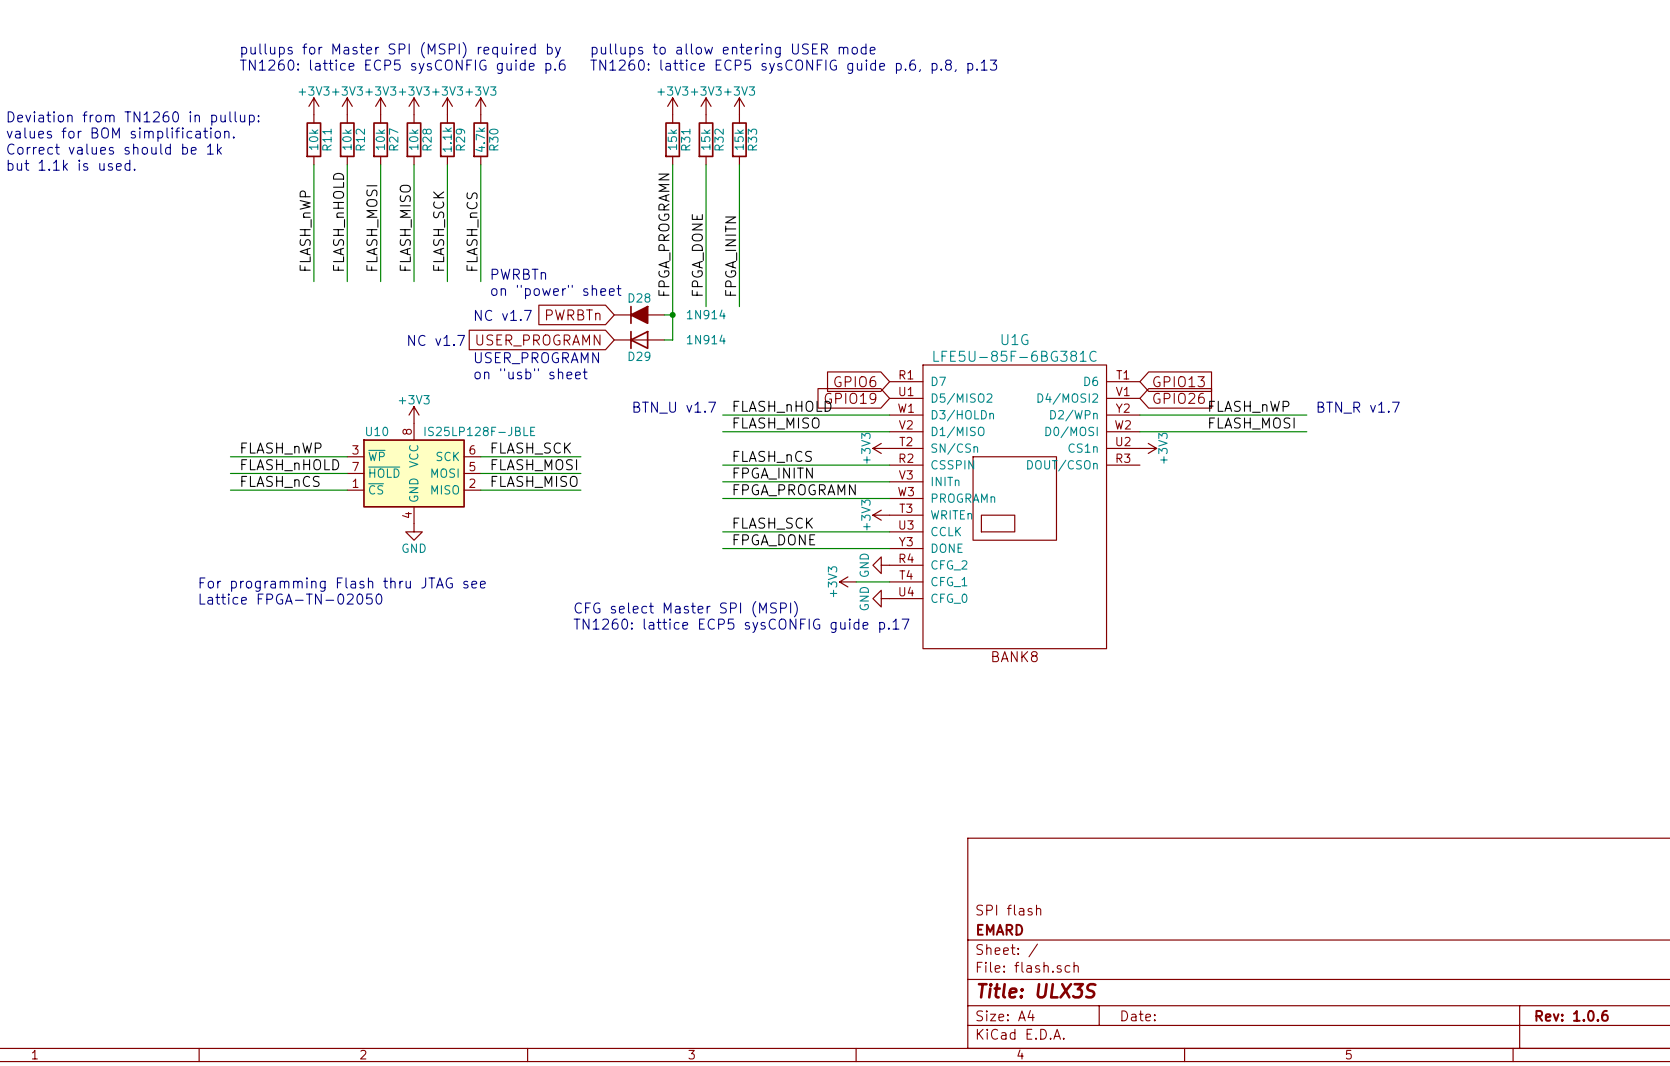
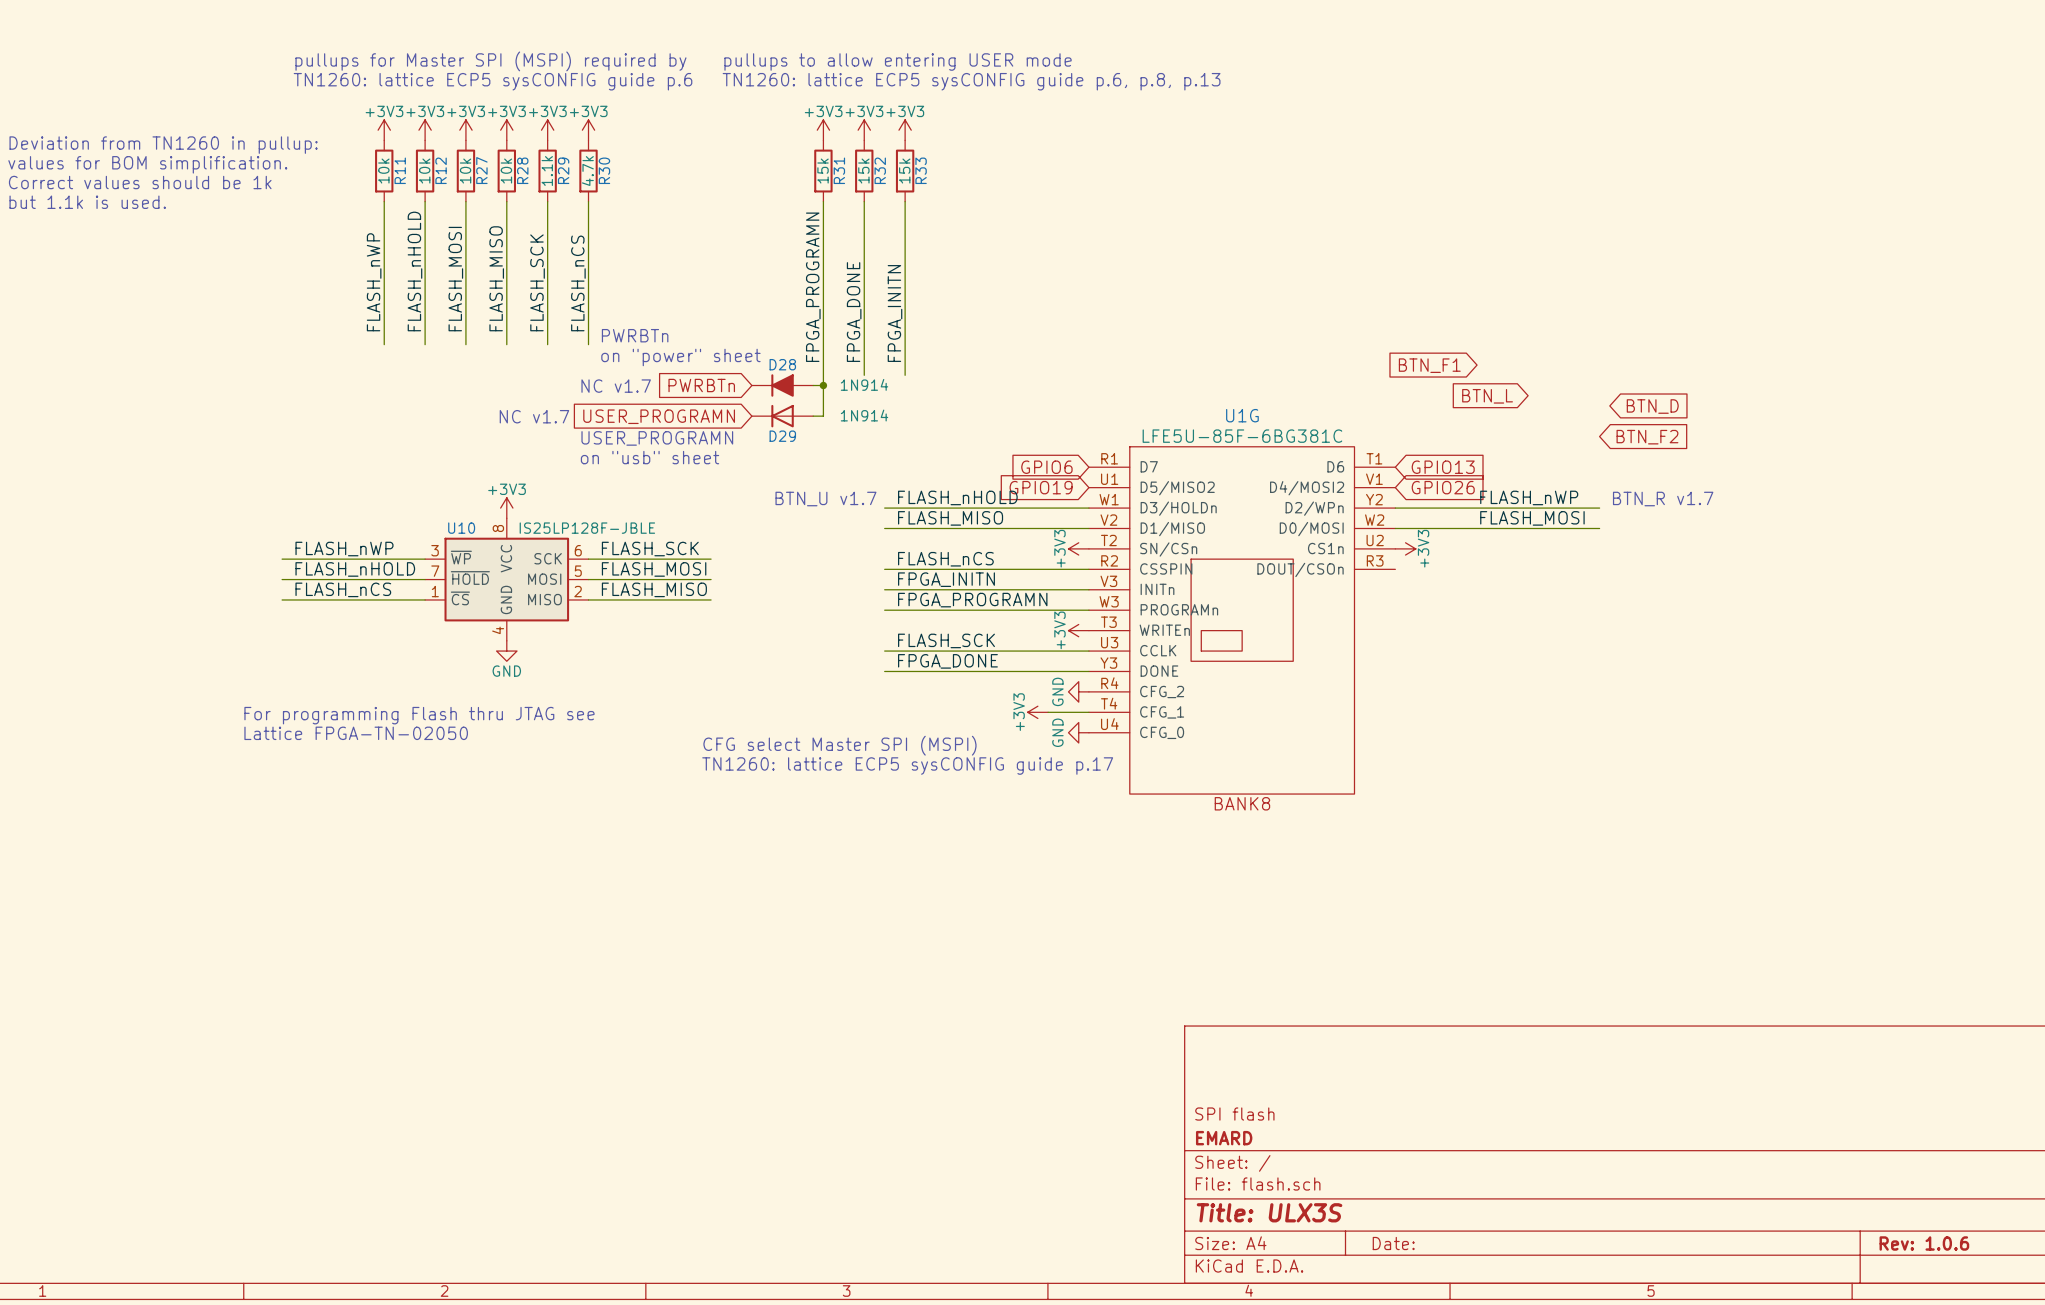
global label: none -> BTN_F1 (1429, 365)
global label: none -> BTN_L (1487, 396)
global label: none -> BTN_D (1652, 406)
global label: none -> BTN_F2 (1647, 437)

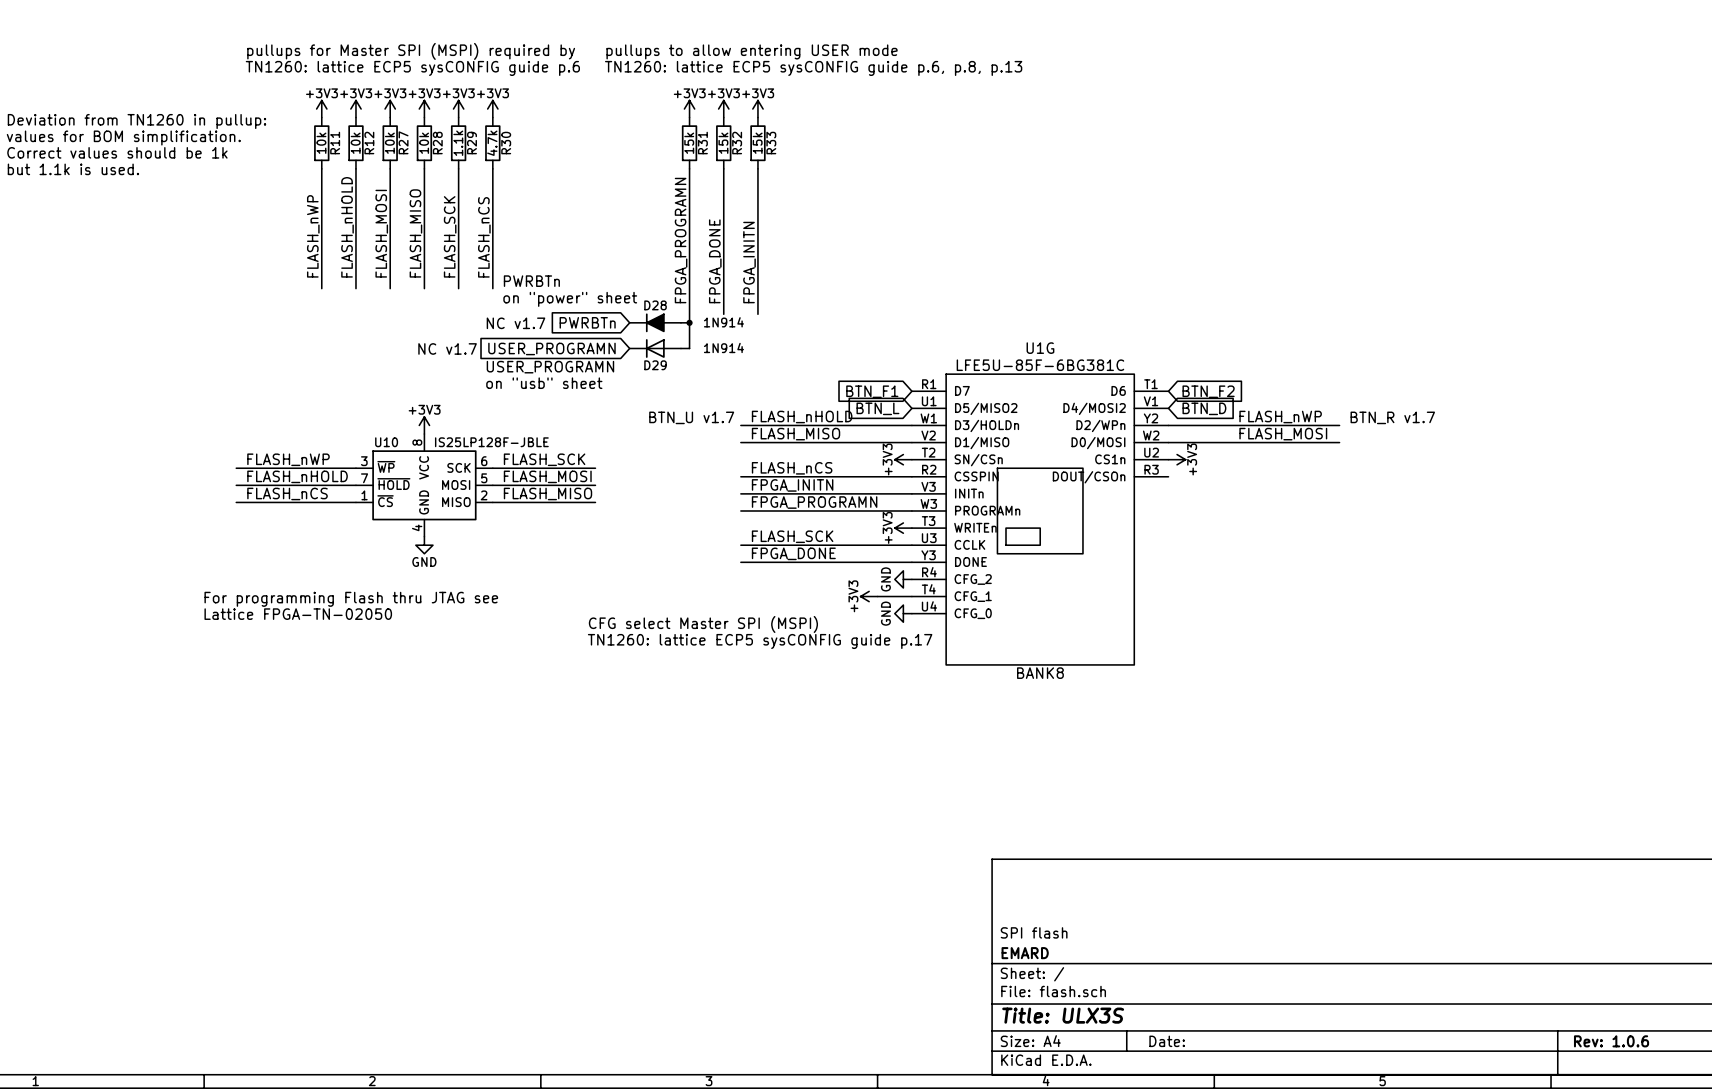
global label: BTN_F1 (1429, 365) -> none
global label: BTN_L (1487, 396) -> none
global label: BTN_D (1652, 406) -> none
global label: BTN_F2 (1647, 437) -> none
global label: GPIO6 (1046, 467) -> BTN_F1 (872, 391)
global label: GPIO13 (1443, 467) -> BTN_F2 (1208, 391)
global label: GPIO19 (1041, 487) -> BTN_L (877, 408)
global label: GPIO26 (1443, 487) -> BTN_D (1204, 408)

